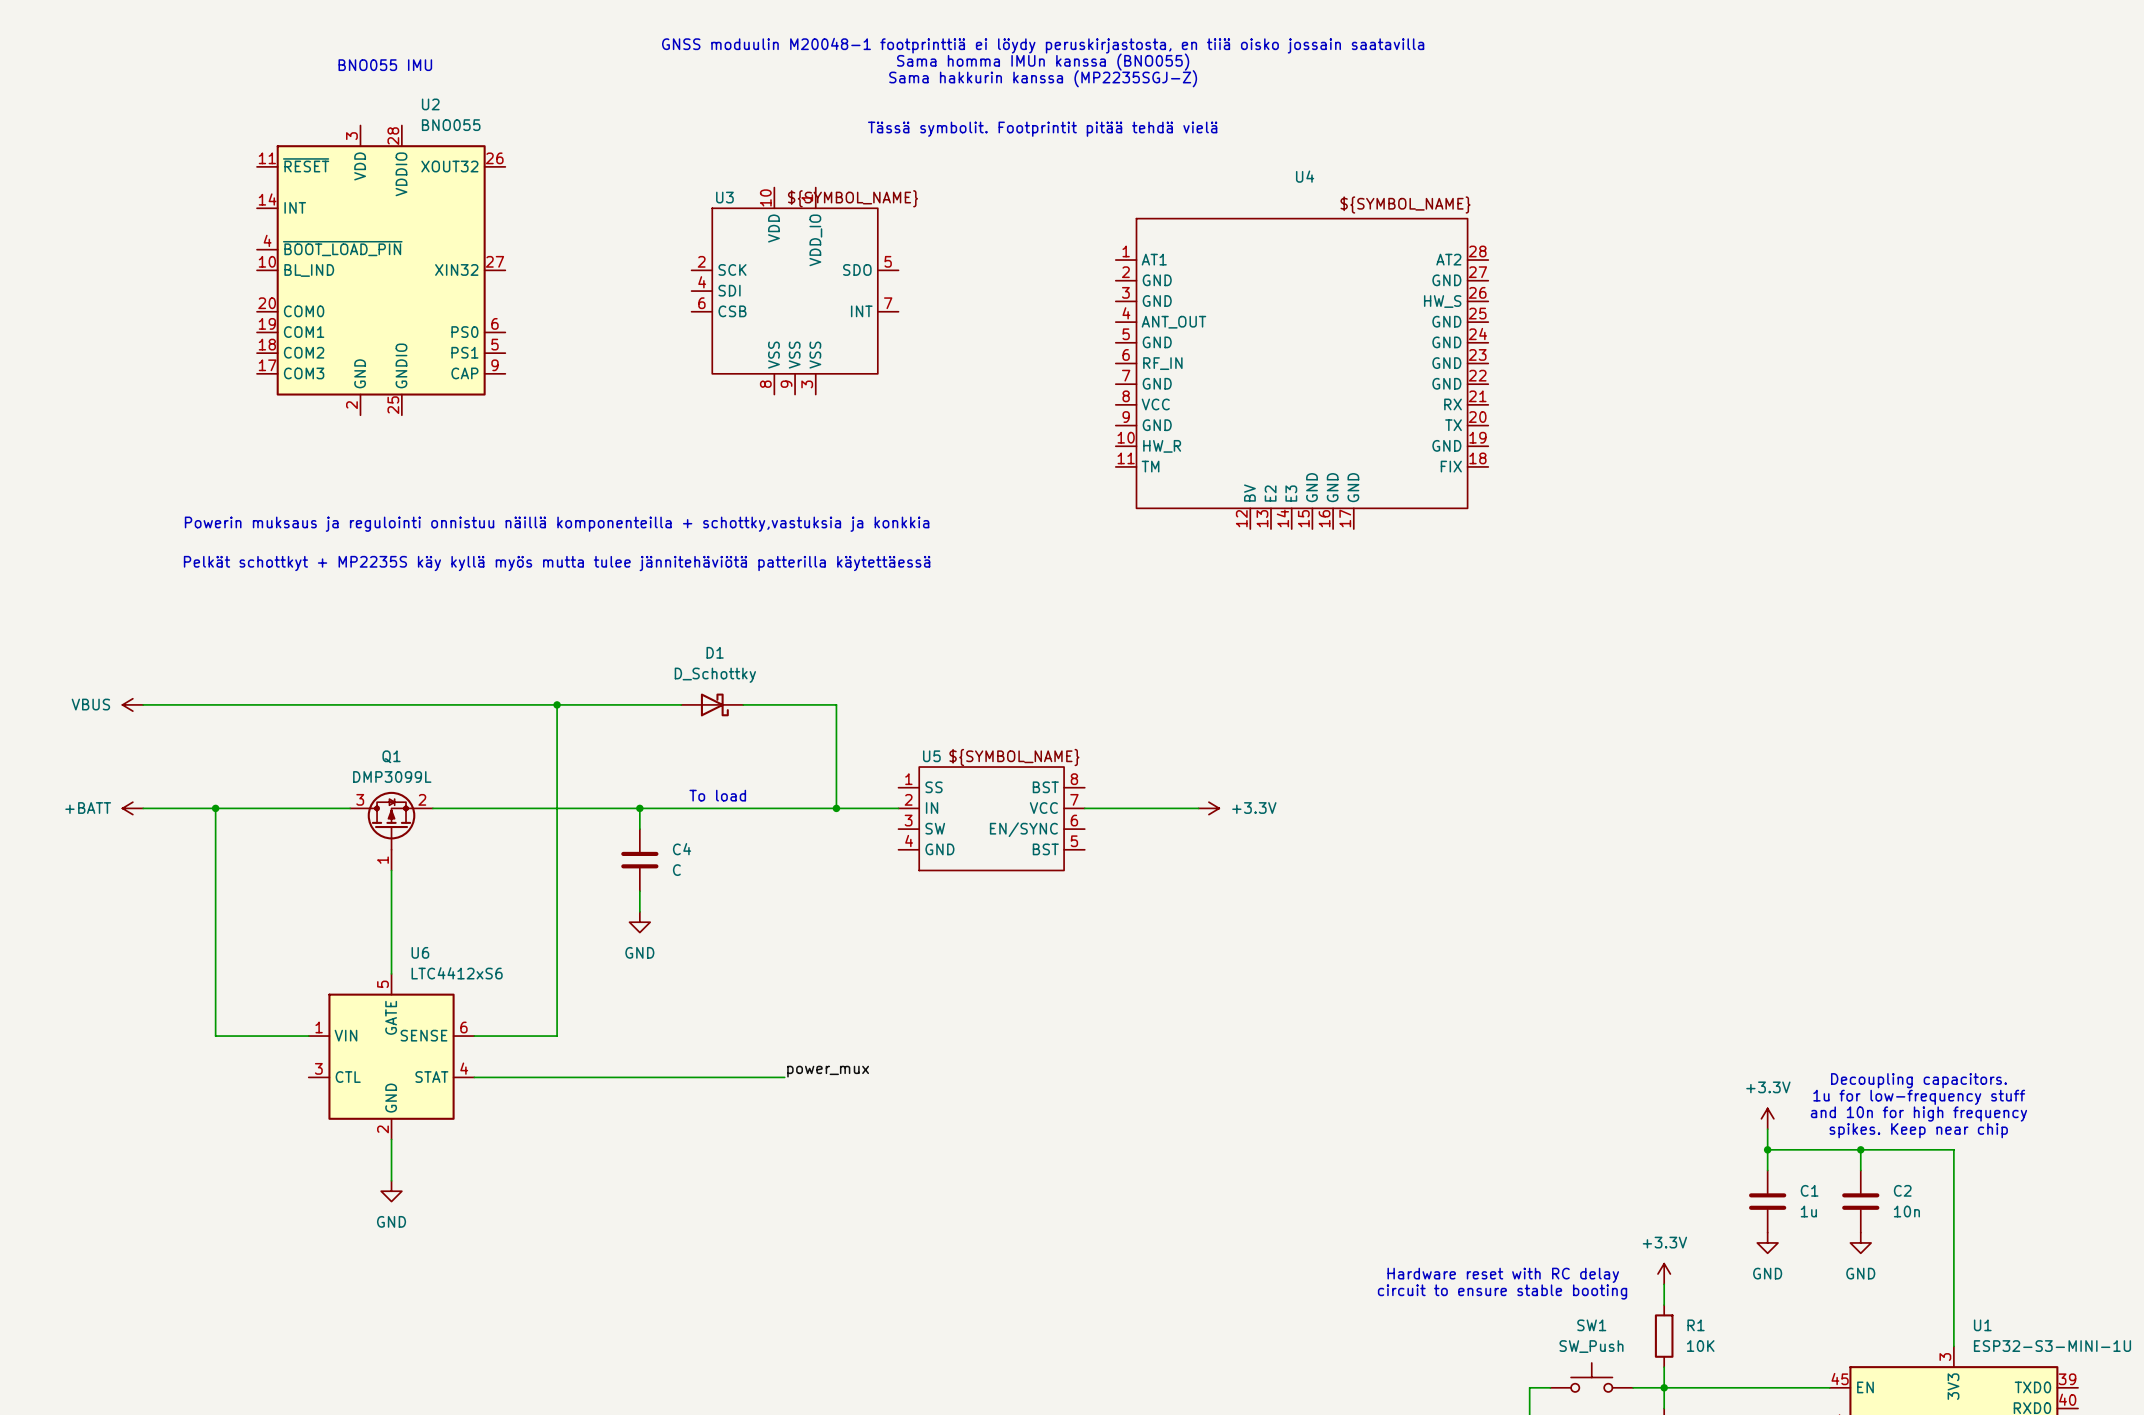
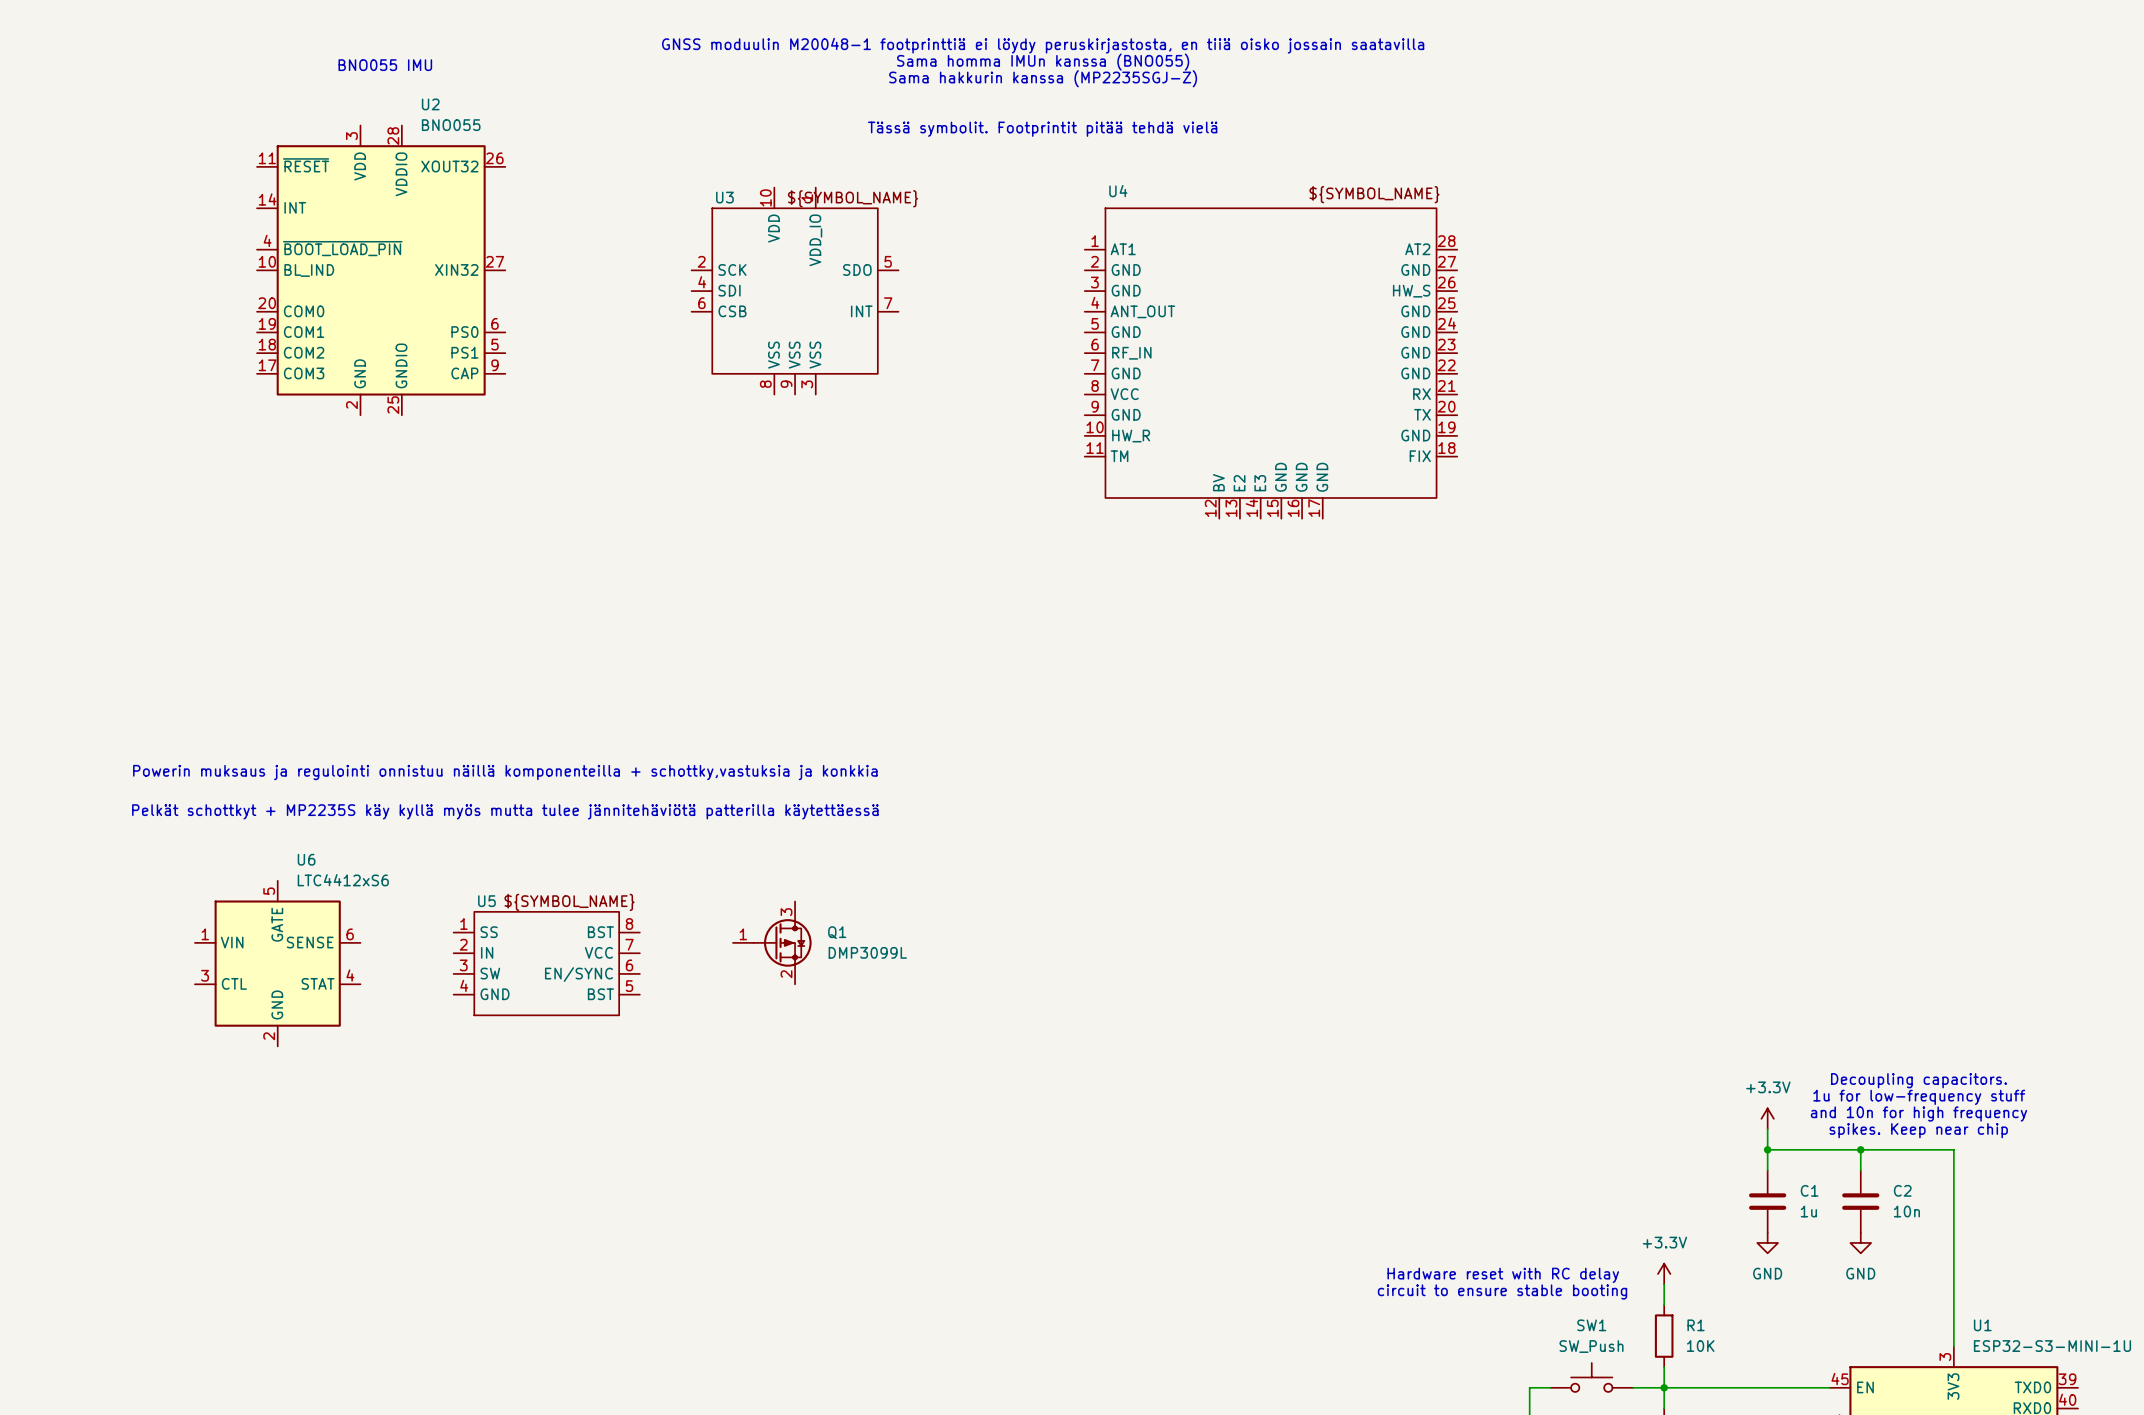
U4 name position: U4 (1305, 176) -> U4 (1118, 191)
U4 position: (1302, 373) -> (1271, 363)
text: Powerin muksaus ja regulointi onnistuu näillä komponenteilla + schottky,vastuksia ja konkkia (557, 524) -> none
text: Pelkät schottkyt + MP2235S käy kyllä myös mutta tulee jännitehäviötä patterilla käytettäessä (557, 563) -> none
power symbol: VBUS (132, 704) -> none
wire: (143, 704) (681, 704) -> none
wire: (557, 704) (557, 1036) (474, 1036) -> none
junction: (557, 704) -> none
D1: D_Schottky (712, 704) -> none
wire: (743, 704) (836, 704) (836, 808) -> none
text: none -> Powerin muksaus ja regulointi onnistuu näillä komponenteilla + schottky,vastuksia ja konkkia (505, 772)
Q1 value position: DMP3099L (392, 776) -> DMP3099L (867, 952)
text: To load (717, 795) -> none
power symbol: +BATT (132, 808) -> none
wire: (143, 808) (350, 808) -> none
wire: (215, 808) (215, 1036) (308, 1036) -> none
junction: (215, 808) -> none
wire: (432, 808) (898, 808) -> none
wire: (639, 808) (639, 829) -> none
junction: (639, 808) -> none
junction: (836, 808) -> none
wire: (1084, 808) (1198, 808) -> none
power symbol: +3.3V (1208, 808) -> none
text: none -> Pelkät schottkyt + MP2235S käy kyllä myös mutta tulee jännitehäviötä patterilla käytettäessä (505, 811)
U5 position: (991, 818) -> (546, 963)
Q1 rotation: 0° (391, 820) -> 90° clockwise (782, 942)
Q1 position: (391, 831) -> (772, 942)
C4: C (639, 860) -> none
wire: (391, 870) (391, 973) -> none
wire: (639, 891) (639, 911) -> none
power symbol: GND (639, 922) -> none
U6 position: (391, 1056) -> (277, 963)
label: power_mux (828, 1071) -> none
wire: (474, 1077) (784, 1077) -> none
wire: (391, 1139) (391, 1180) -> none
power symbol: GND (391, 1191) -> none

